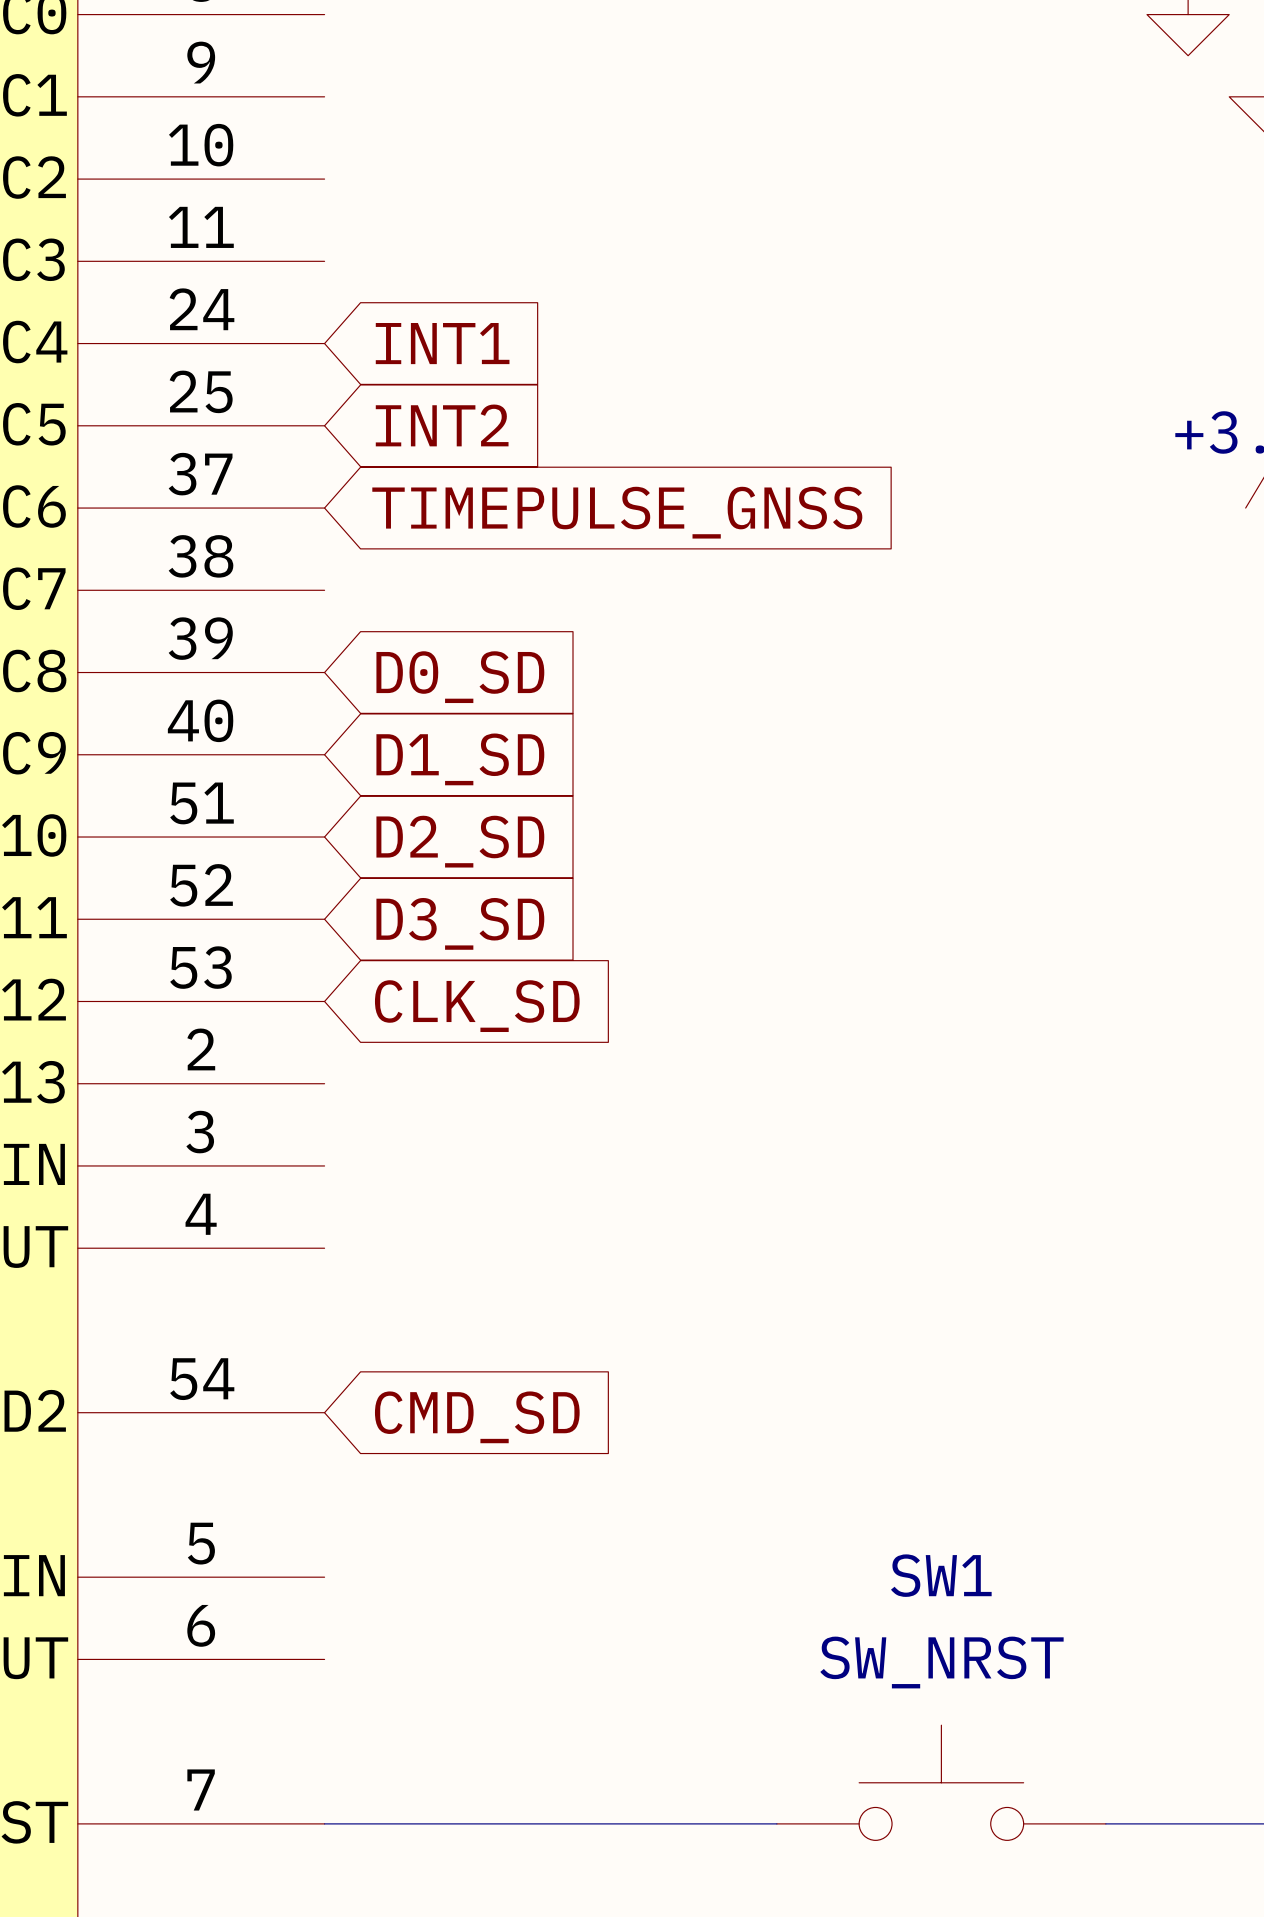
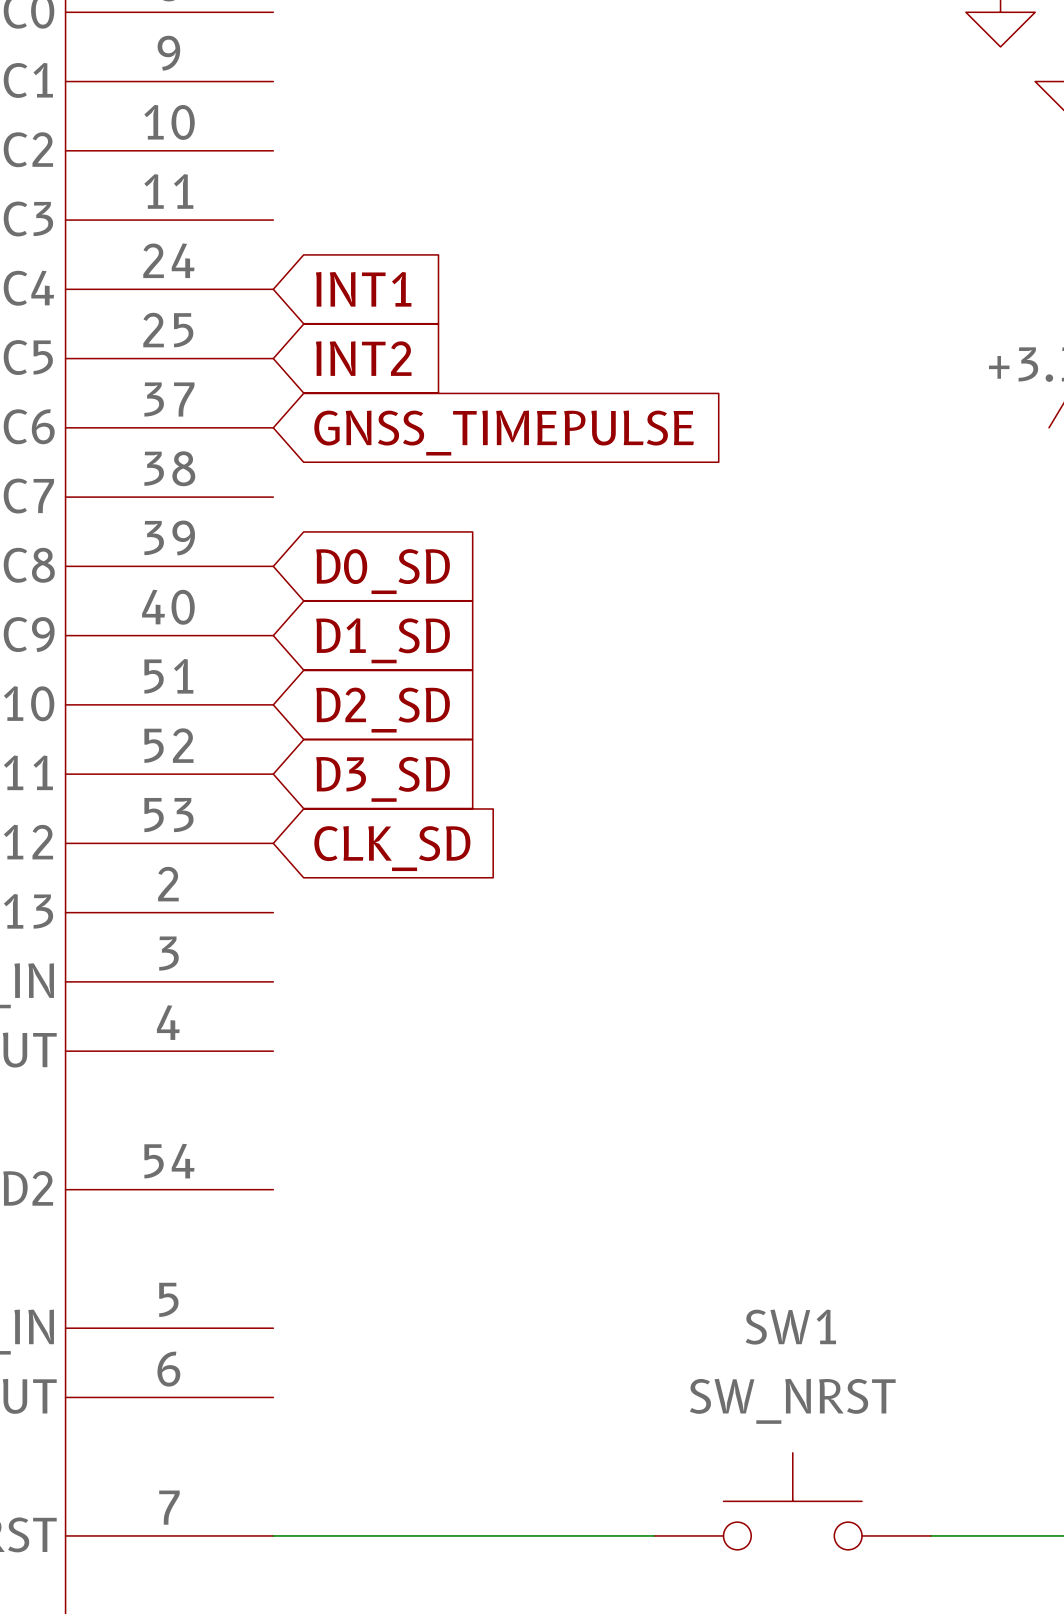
global label: TIMEPULSE_GNSS (617, 512) -> GNSS_TIMEPULSE (504, 433)
global label: CMD_SD (477, 1417) -> none

